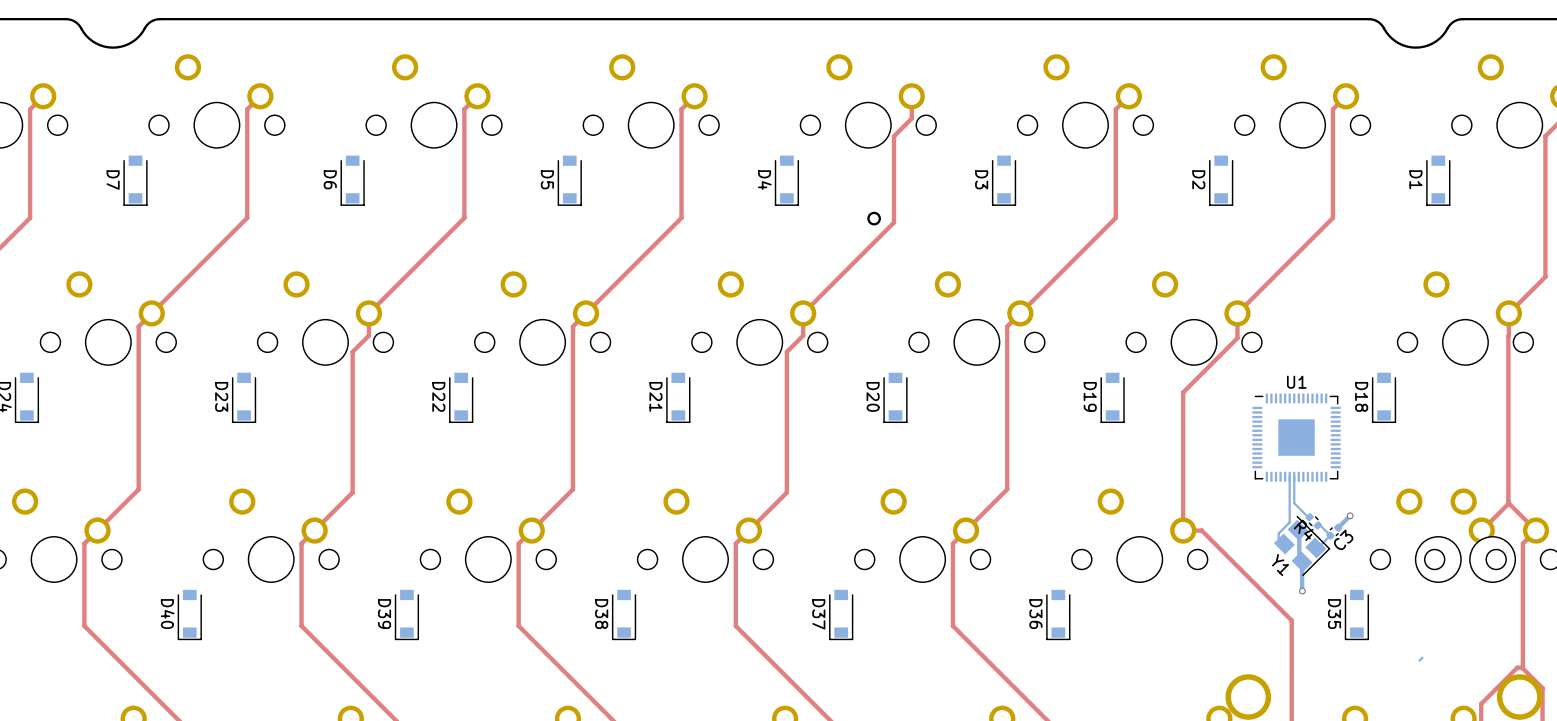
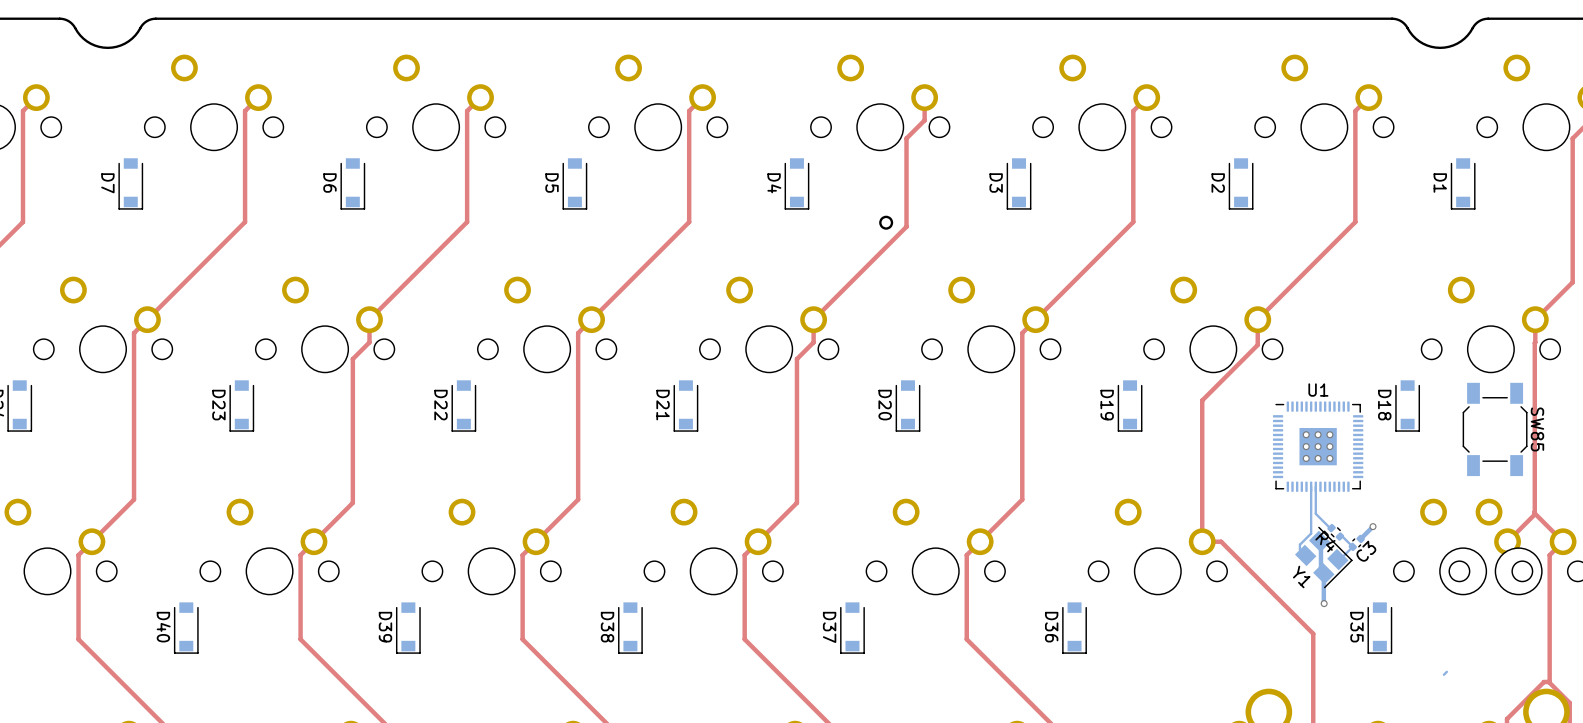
SW85: none -> (1495, 429)
via: none -> (1306, 434)
via: none -> (1318, 434)
via: none -> (1329, 434)
via: none -> (1306, 446)
via: none -> (1318, 446)
via: none -> (1329, 446)
via: none -> (1306, 458)
via: none -> (1318, 458)
via: none -> (1329, 458)

